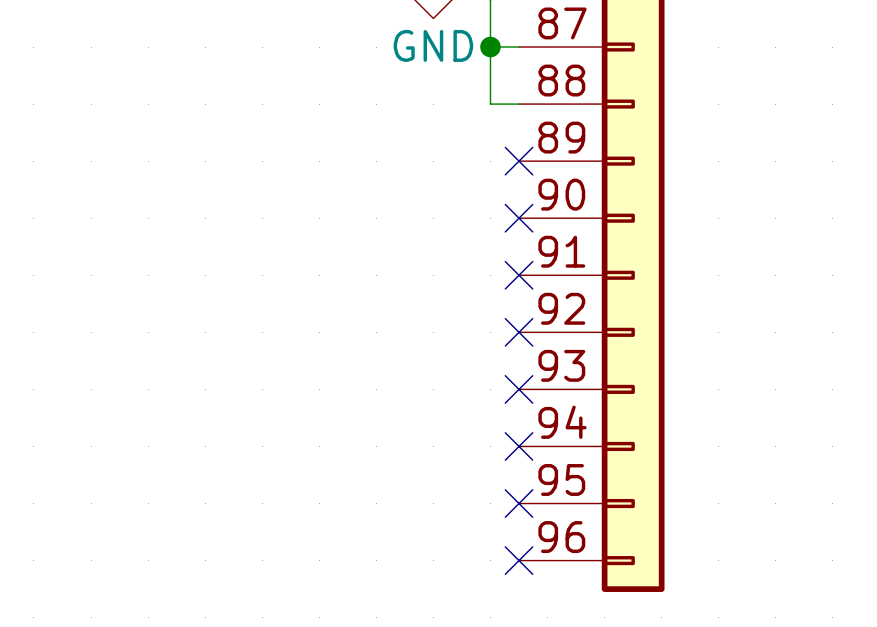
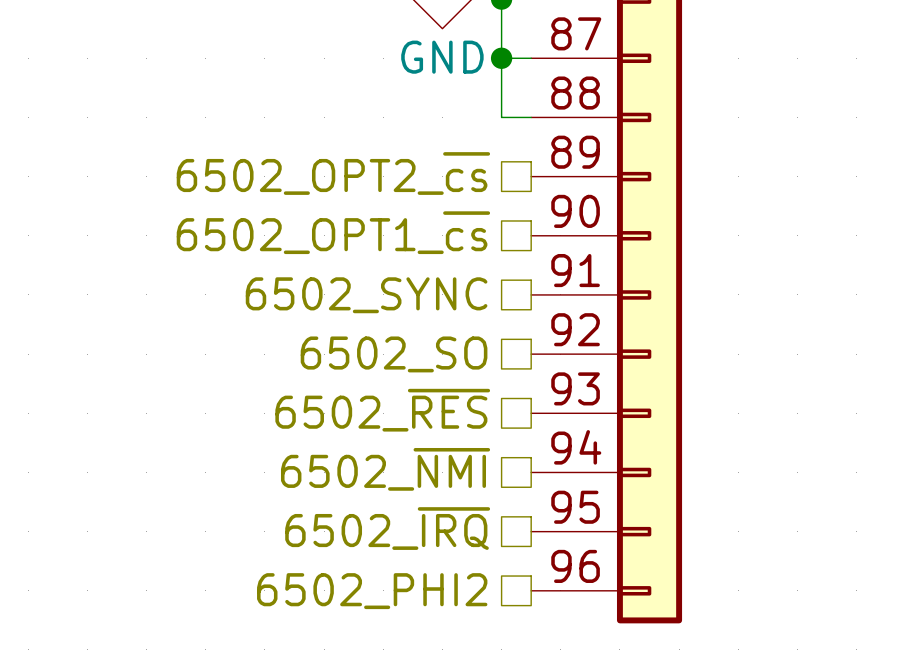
hierarchical label: none -> 6502_OPT2_~{cs} (333, 173)
no-connect mark: (519, 161) -> none
hierarchical label: none -> 6502_OPT1_~{cs} (333, 232)
no-connect mark: (519, 218) -> none
hierarchical label: none -> 6502_SYNC (366, 295)
no-connect mark: (519, 275) -> none
hierarchical label: none -> 6502_SO (394, 354)
no-connect mark: (519, 332) -> none
hierarchical label: none -> 6502_~{RES} (382, 410)
no-connect mark: (519, 389) -> none
hierarchical label: none -> 6502_~{NMI} (385, 469)
no-connect mark: (519, 446) -> none
hierarchical label: none -> 6502_~{IRQ} (387, 528)
no-connect mark: (519, 503) -> none
hierarchical label: none -> 6502_PHI2 (372, 591)
no-connect mark: (519, 560) -> none

